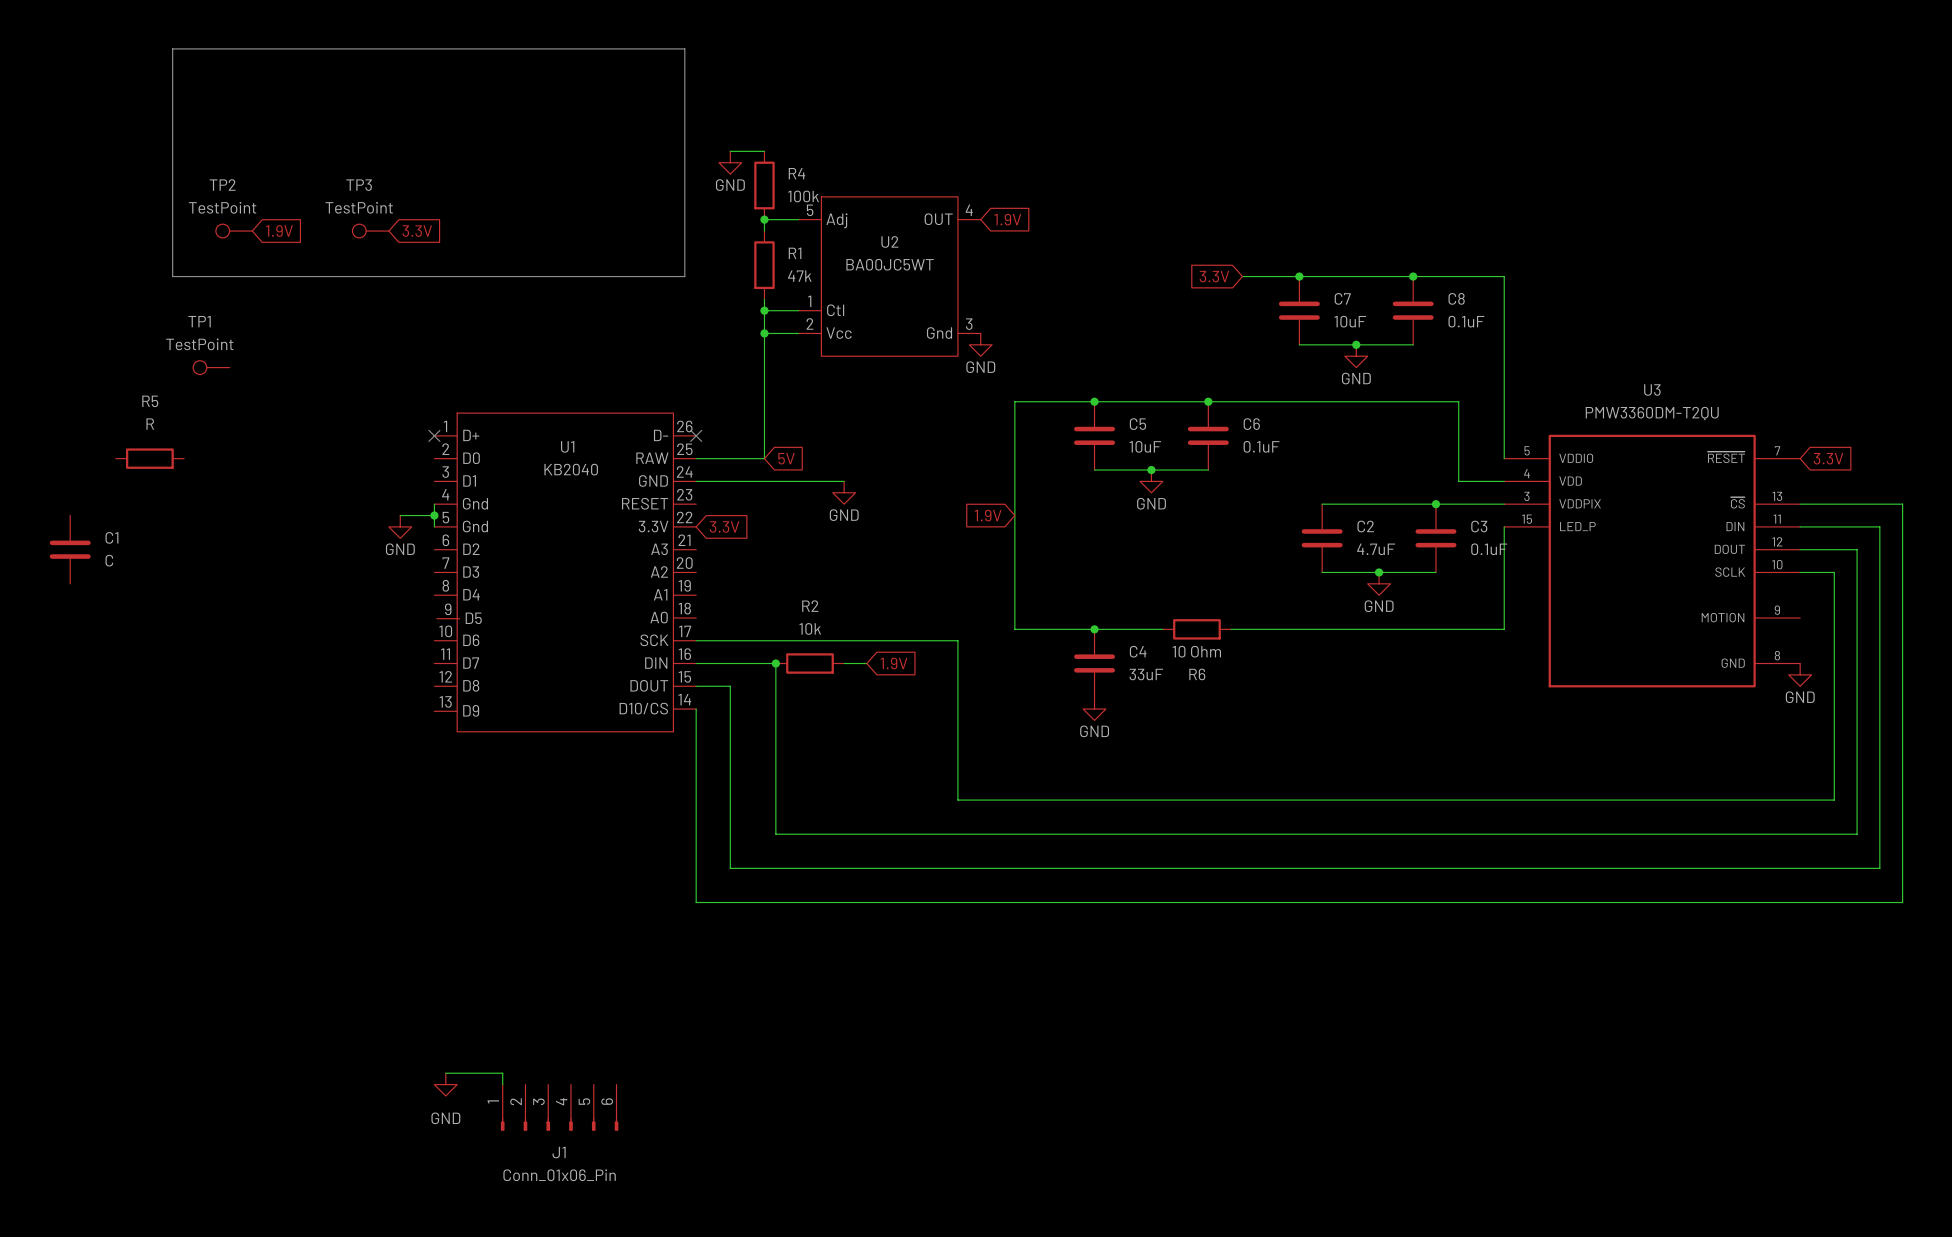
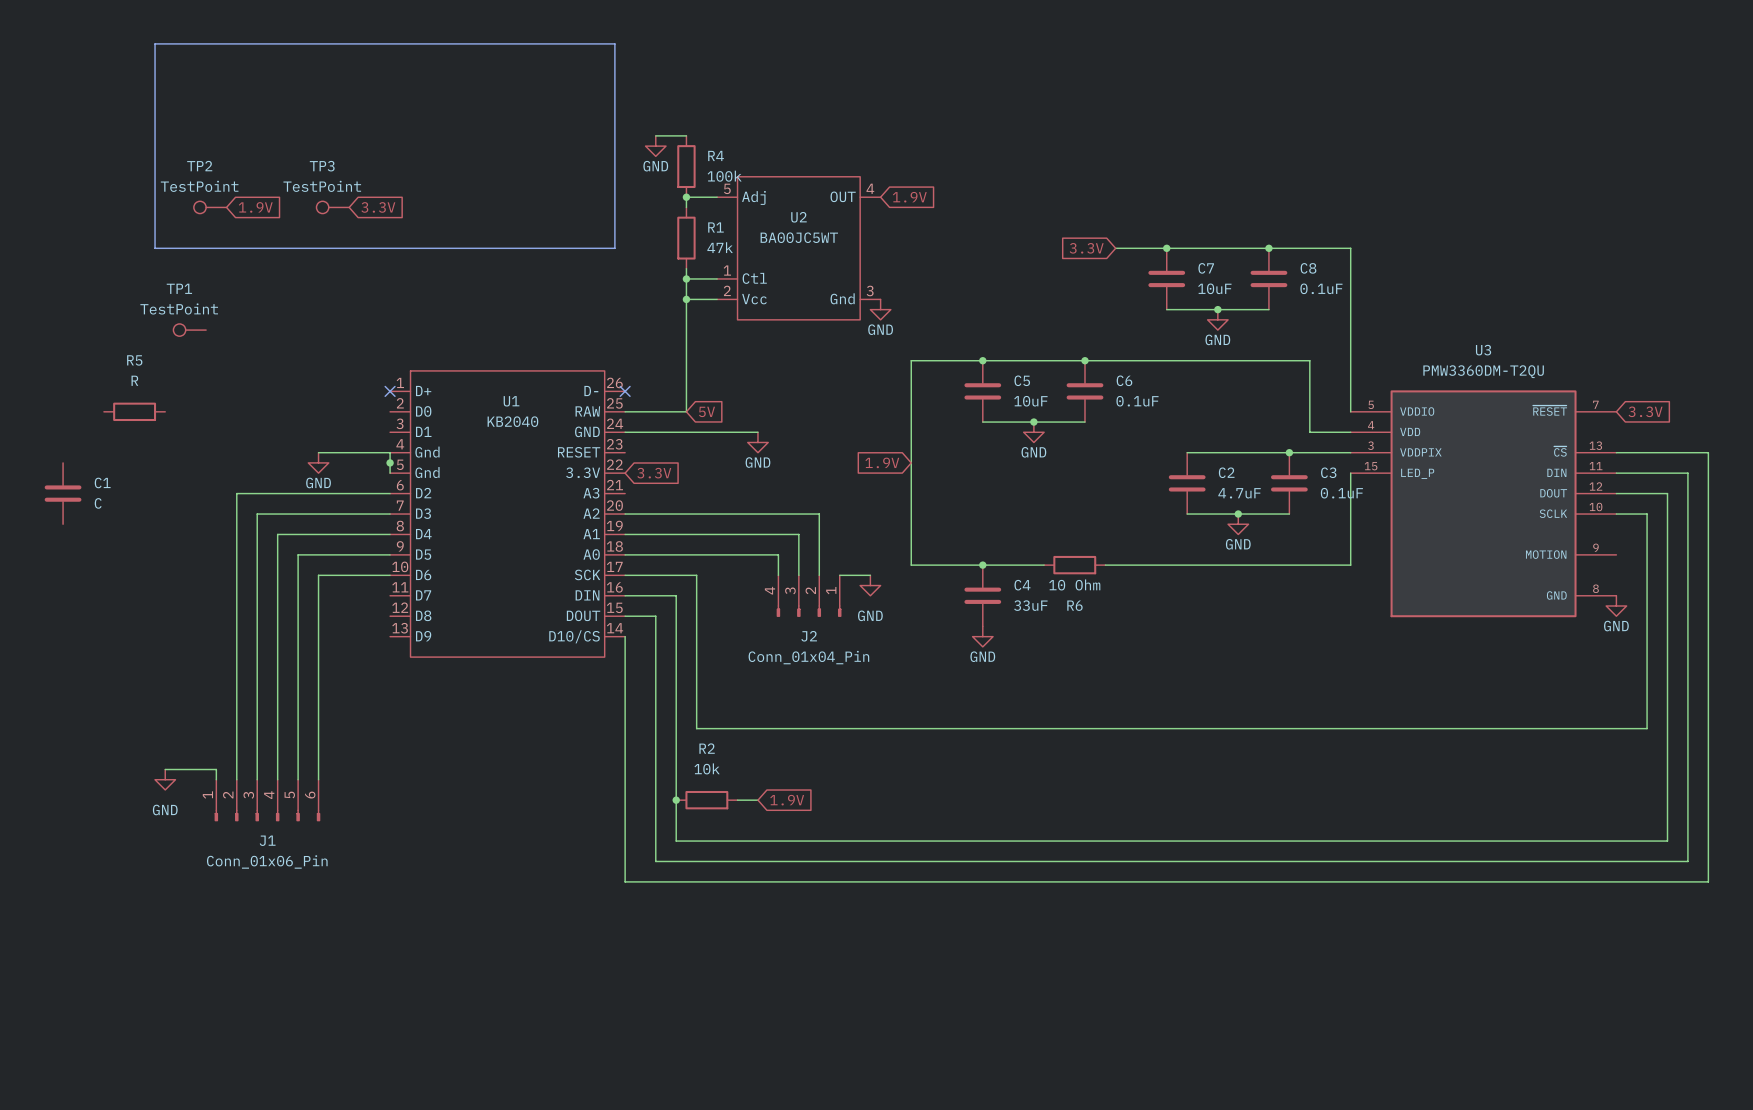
U1 symbol: [434, 413, 697, 732] -> [390, 370, 626, 658]
wire: none -> (318, 452) (390, 452)
wire: (400, 515) (434, 515) -> none
power symbol position: GND (400, 526) -> GND (318, 462)
wire: none -> (390, 493) (236, 493) (236, 779)
wire: none -> (390, 514) (257, 514) (257, 779)
wire: none -> (625, 514) (819, 514) (819, 575)
wire: none -> (390, 534) (277, 534) (277, 779)
wire: none -> (625, 534) (798, 534) (798, 575)
wire: none -> (390, 554) (298, 554) (298, 779)
wire: none -> (625, 554) (778, 554) (778, 575)
wire: none -> (390, 575) (318, 575) (318, 779)
wire: (775, 640) (935, 640) -> none
wire: (957, 640) (957, 800) (1834, 800) -> (860, 575) (870, 575)
power symbol: none -> GND (870, 585)
wire: (753, 663) (775, 663) -> (696, 575) (696, 595)
wire: none -> (676, 595) (676, 841) (1667, 841) (1667, 749)
junction: (775, 663) -> none
R2 position: (810, 663) -> (706, 800)
wire: (844, 663) (866, 663) -> none
global label: 1.9V (894, 663) -> none
J2: none -> Conn_01x04_Pin (809, 596)
wire: (775, 811) (775, 834) (1857, 834) -> (696, 728) (1647, 728) (1647, 718)
wire: none -> (165, 769) (216, 769) (216, 779)
power symbol: none -> GND (165, 779)
wire: (730, 868) (1879, 868) -> (655, 779) (655, 861) (1687, 861) (1687, 779)
junction: none -> (676, 800)
wire: none -> (737, 800) (757, 800)
global label: none -> 1.9V (787, 800)
wire: (696, 902) (1902, 902) -> (625, 810) (625, 881) (1708, 881) (1708, 810)
wire: (445, 1073) (502, 1073) (502, 1084) -> none
power symbol: GND (445, 1084) -> none
J1 position: (559, 1107) -> (267, 800)

